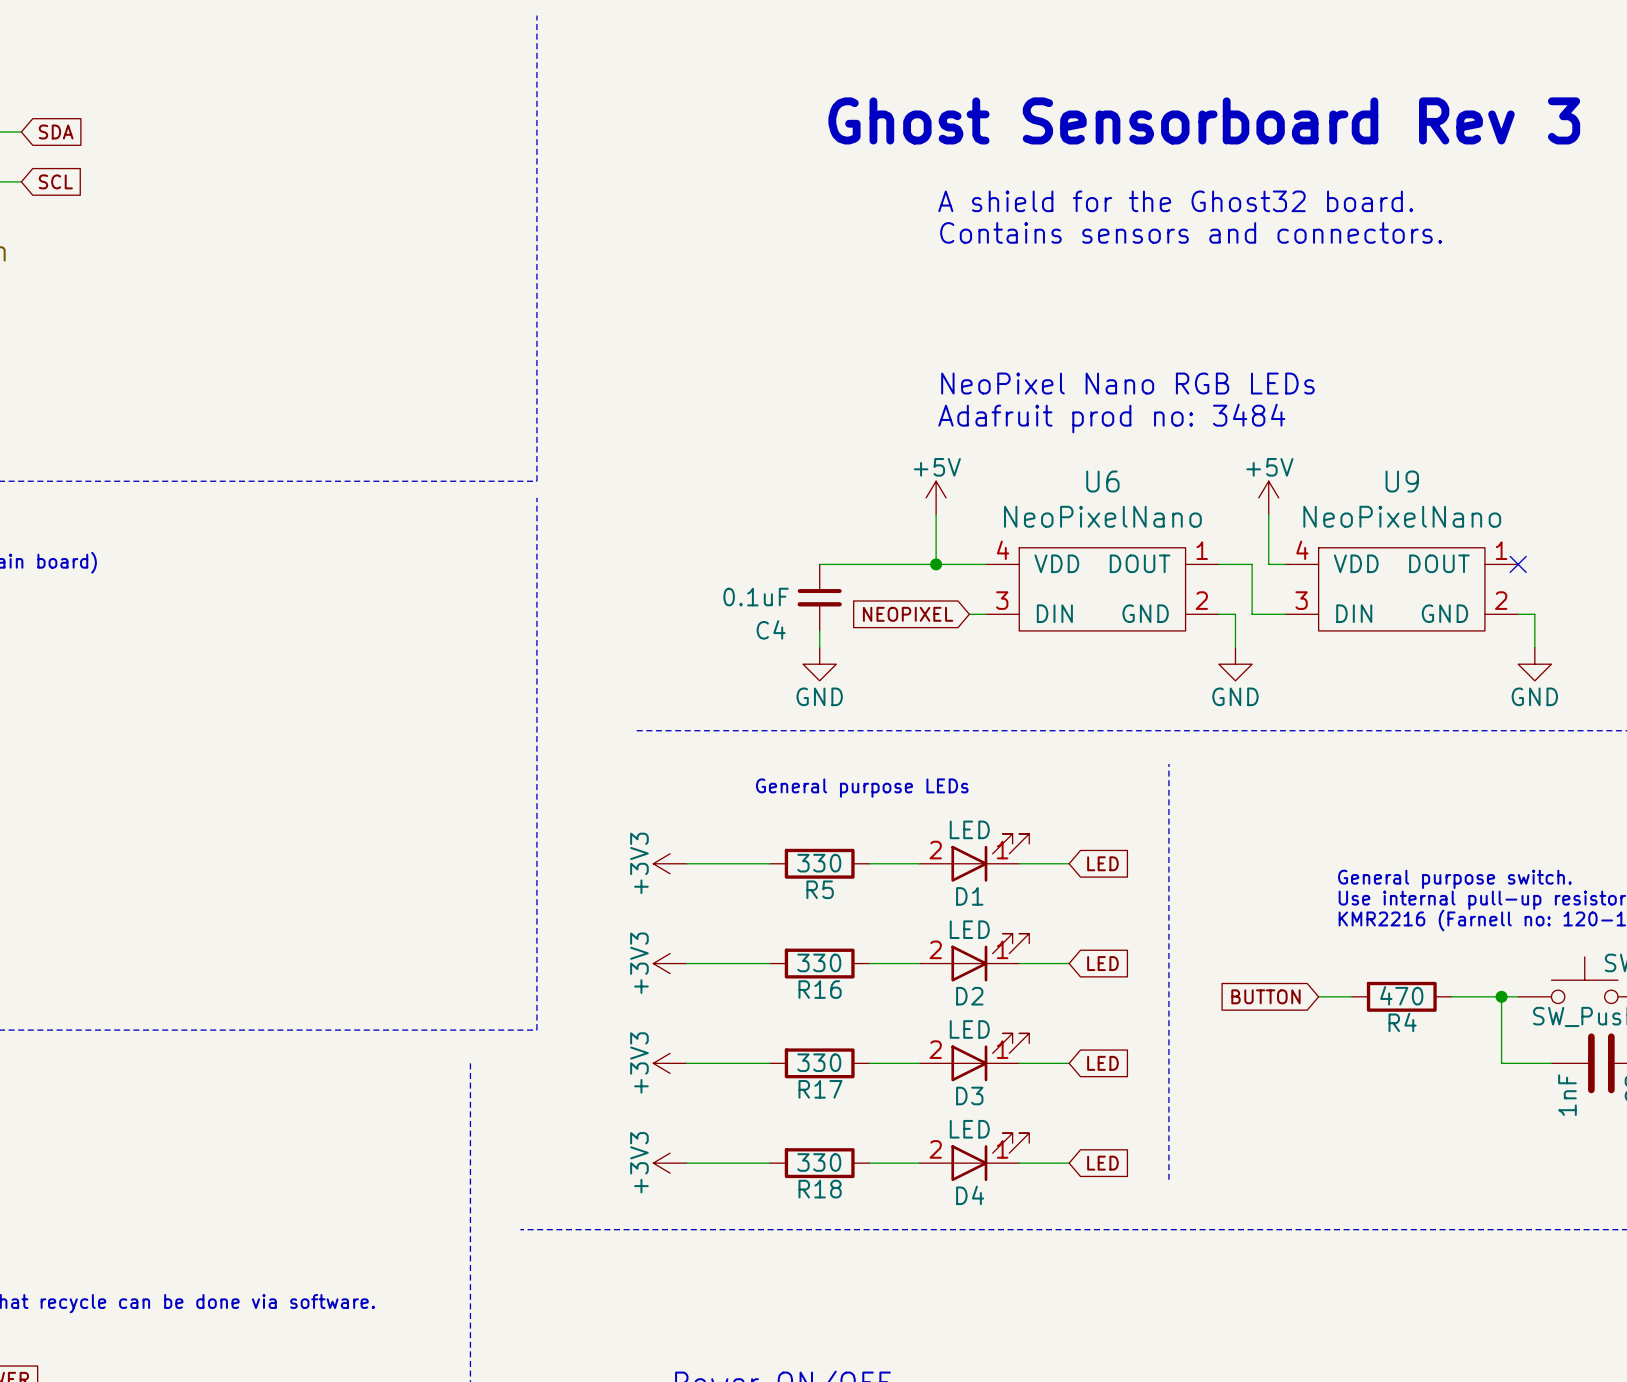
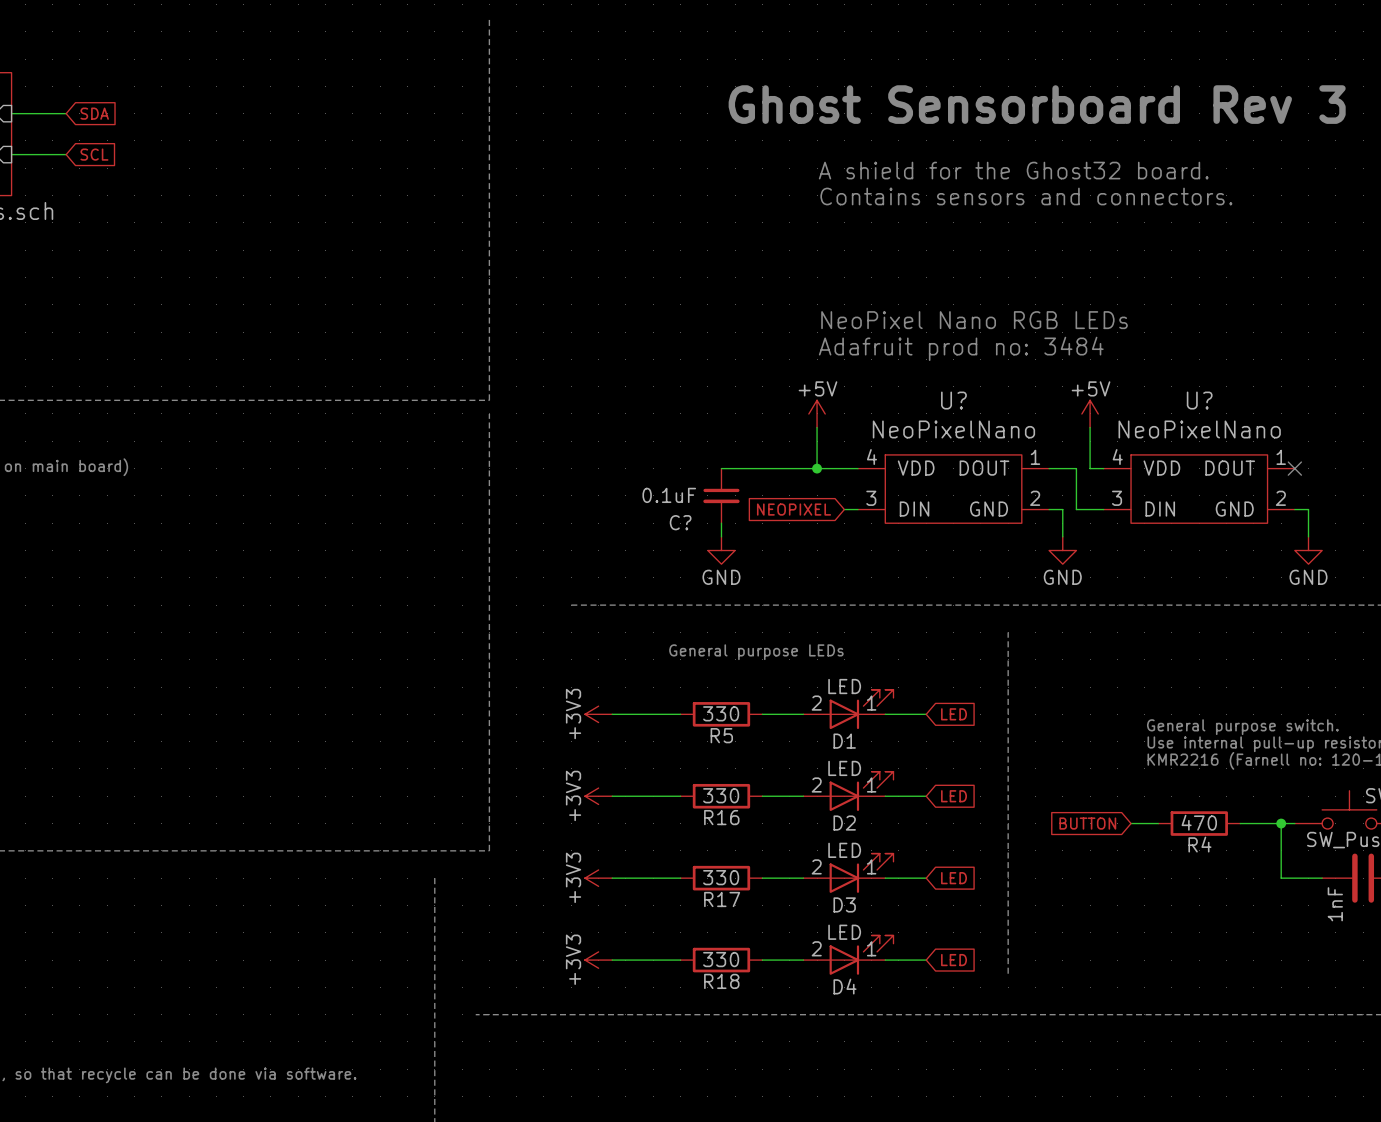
U6 name: U6 (1102, 481) -> U? (953, 400)
U9 name: U9 (1402, 481) -> U? (1199, 400)
C4 name: C4 (771, 629) -> C? (680, 522)

